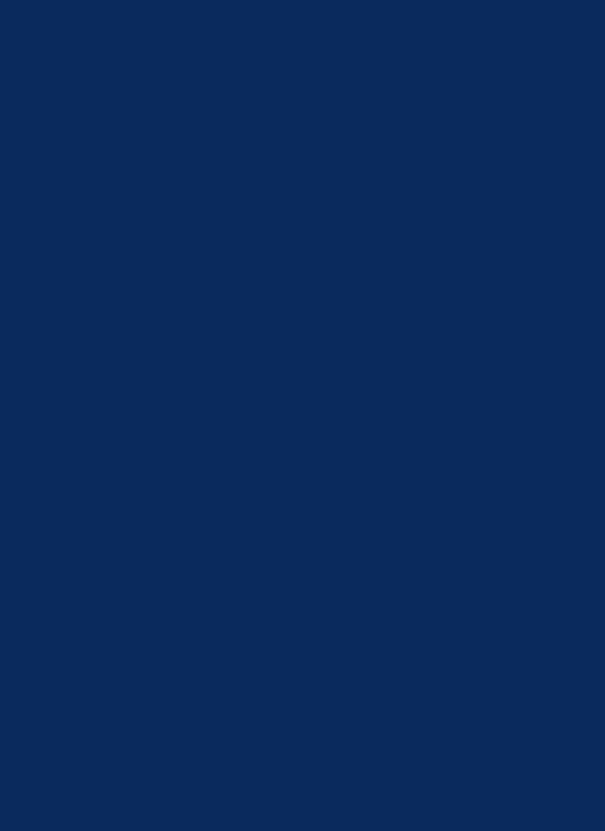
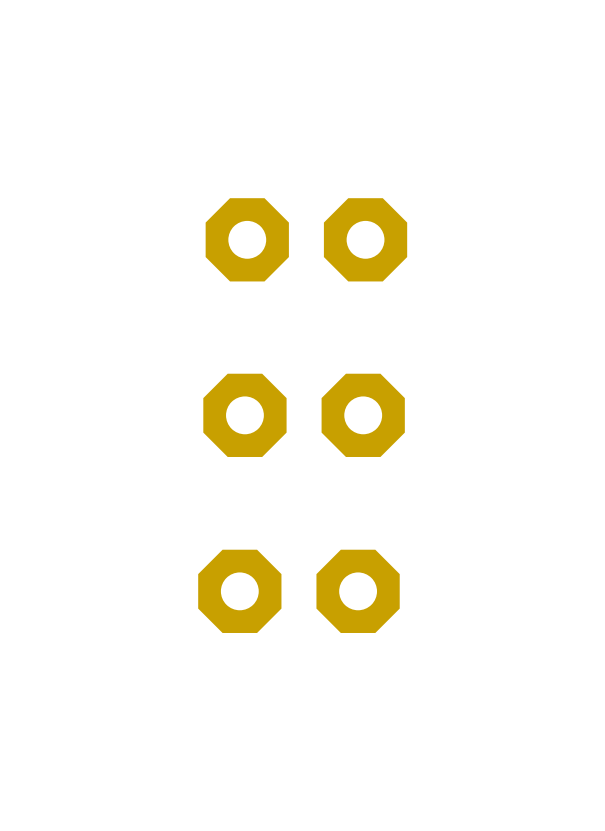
part: none -> (306, 239)
part: none -> (304, 415)
part: none -> (298, 591)

